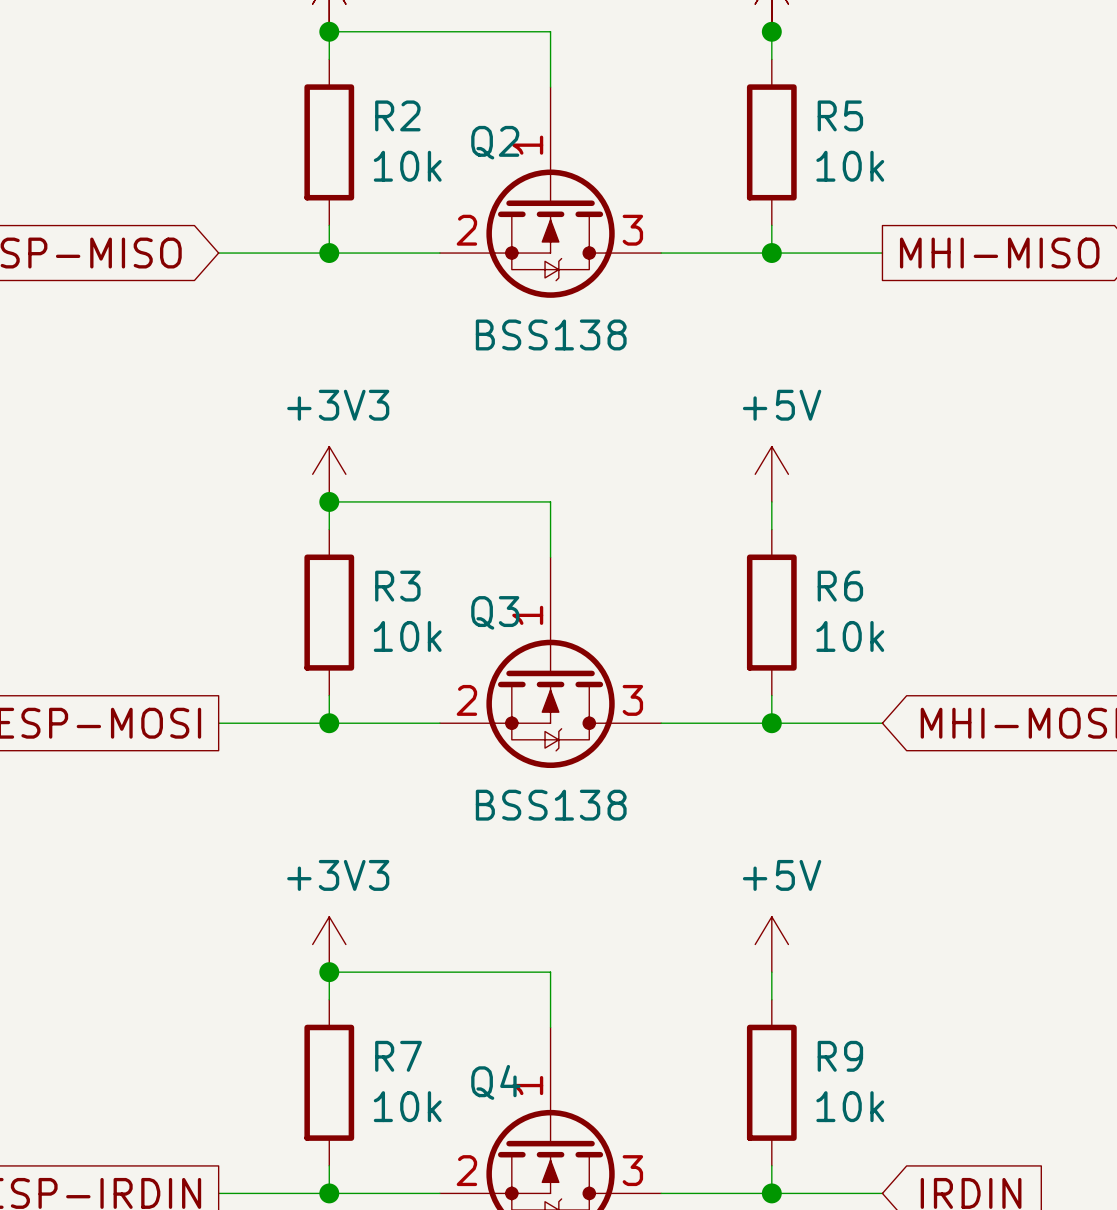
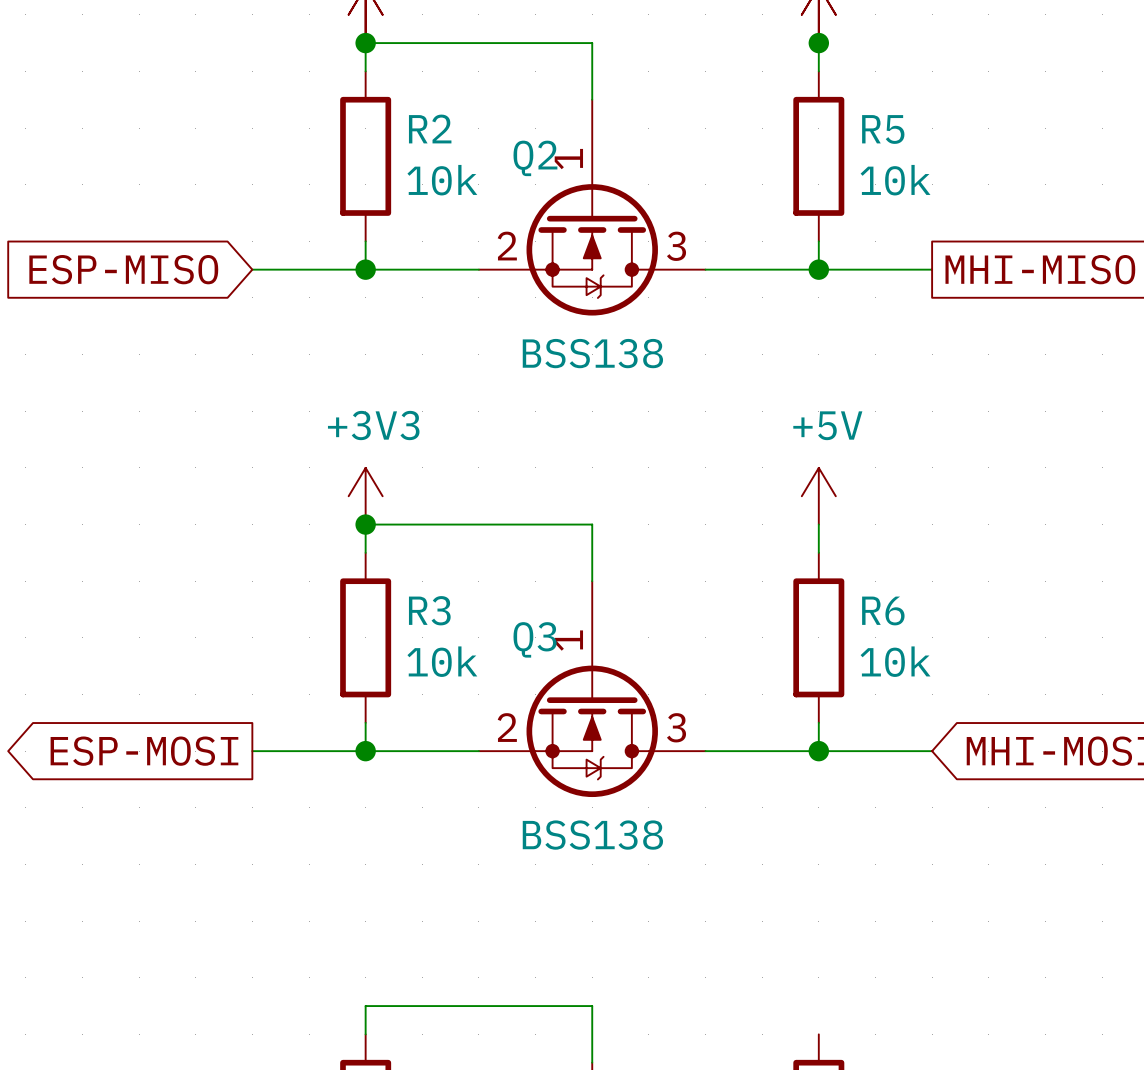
power symbol: +3V3 (329, 944) -> none
power symbol: +5V (771, 944) -> none
junction: (329, 972) -> none
wire: (771, 972) (771, 999) -> none

